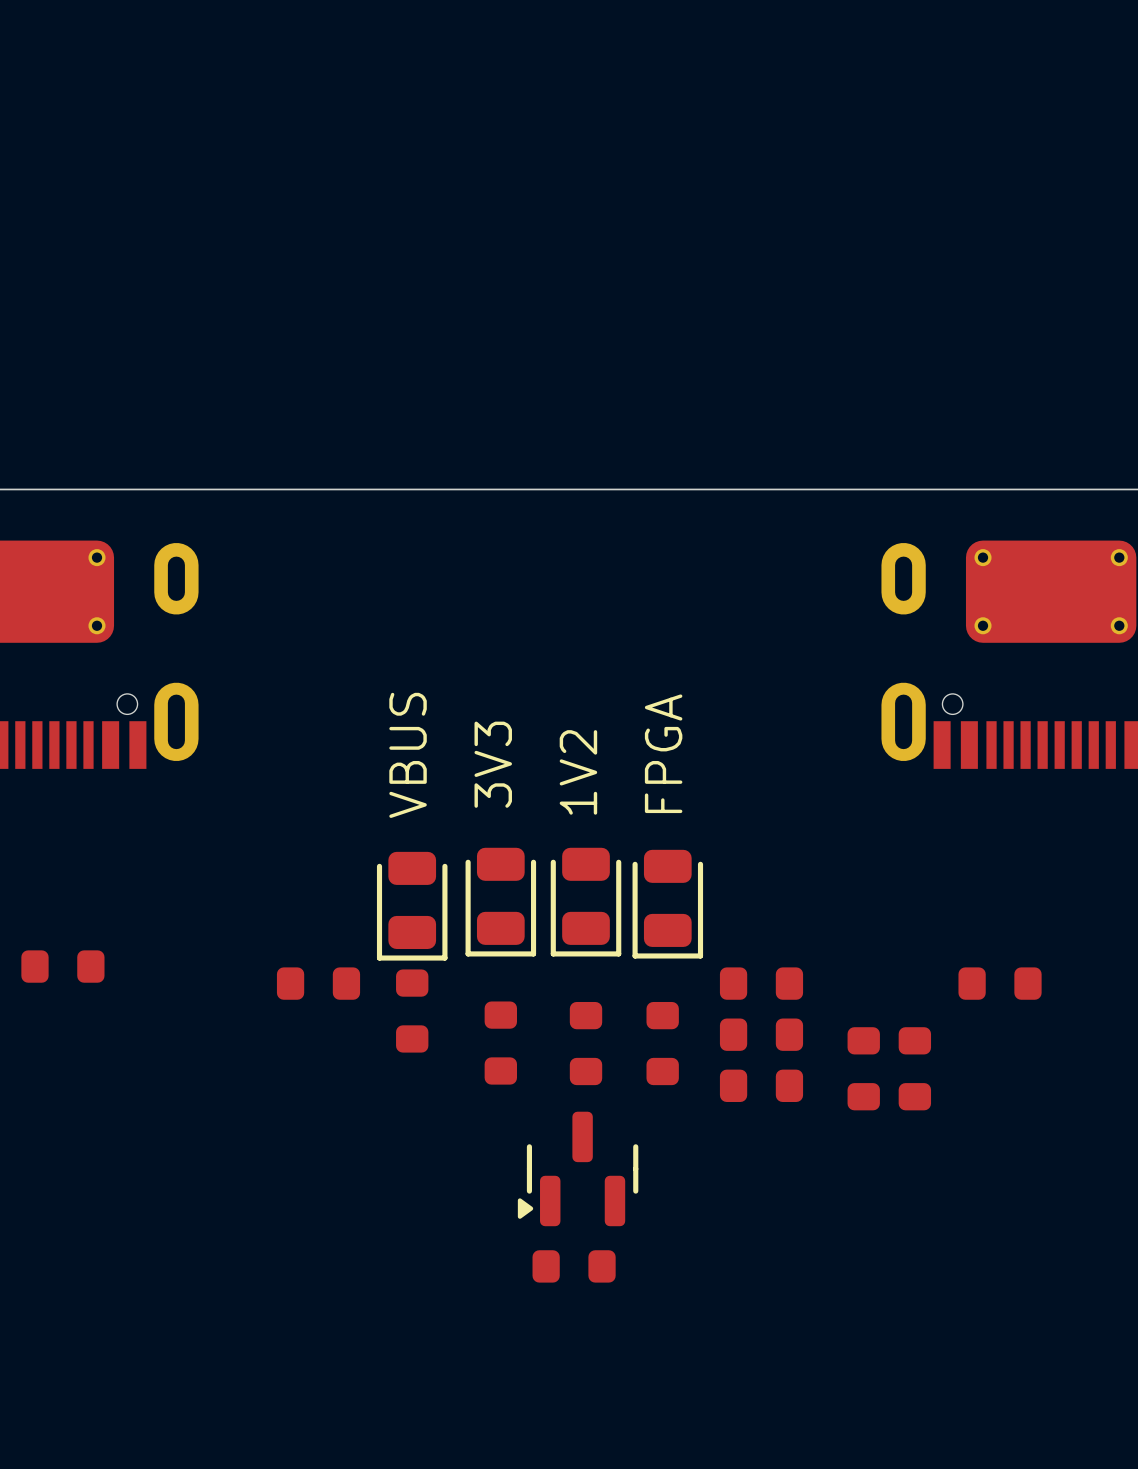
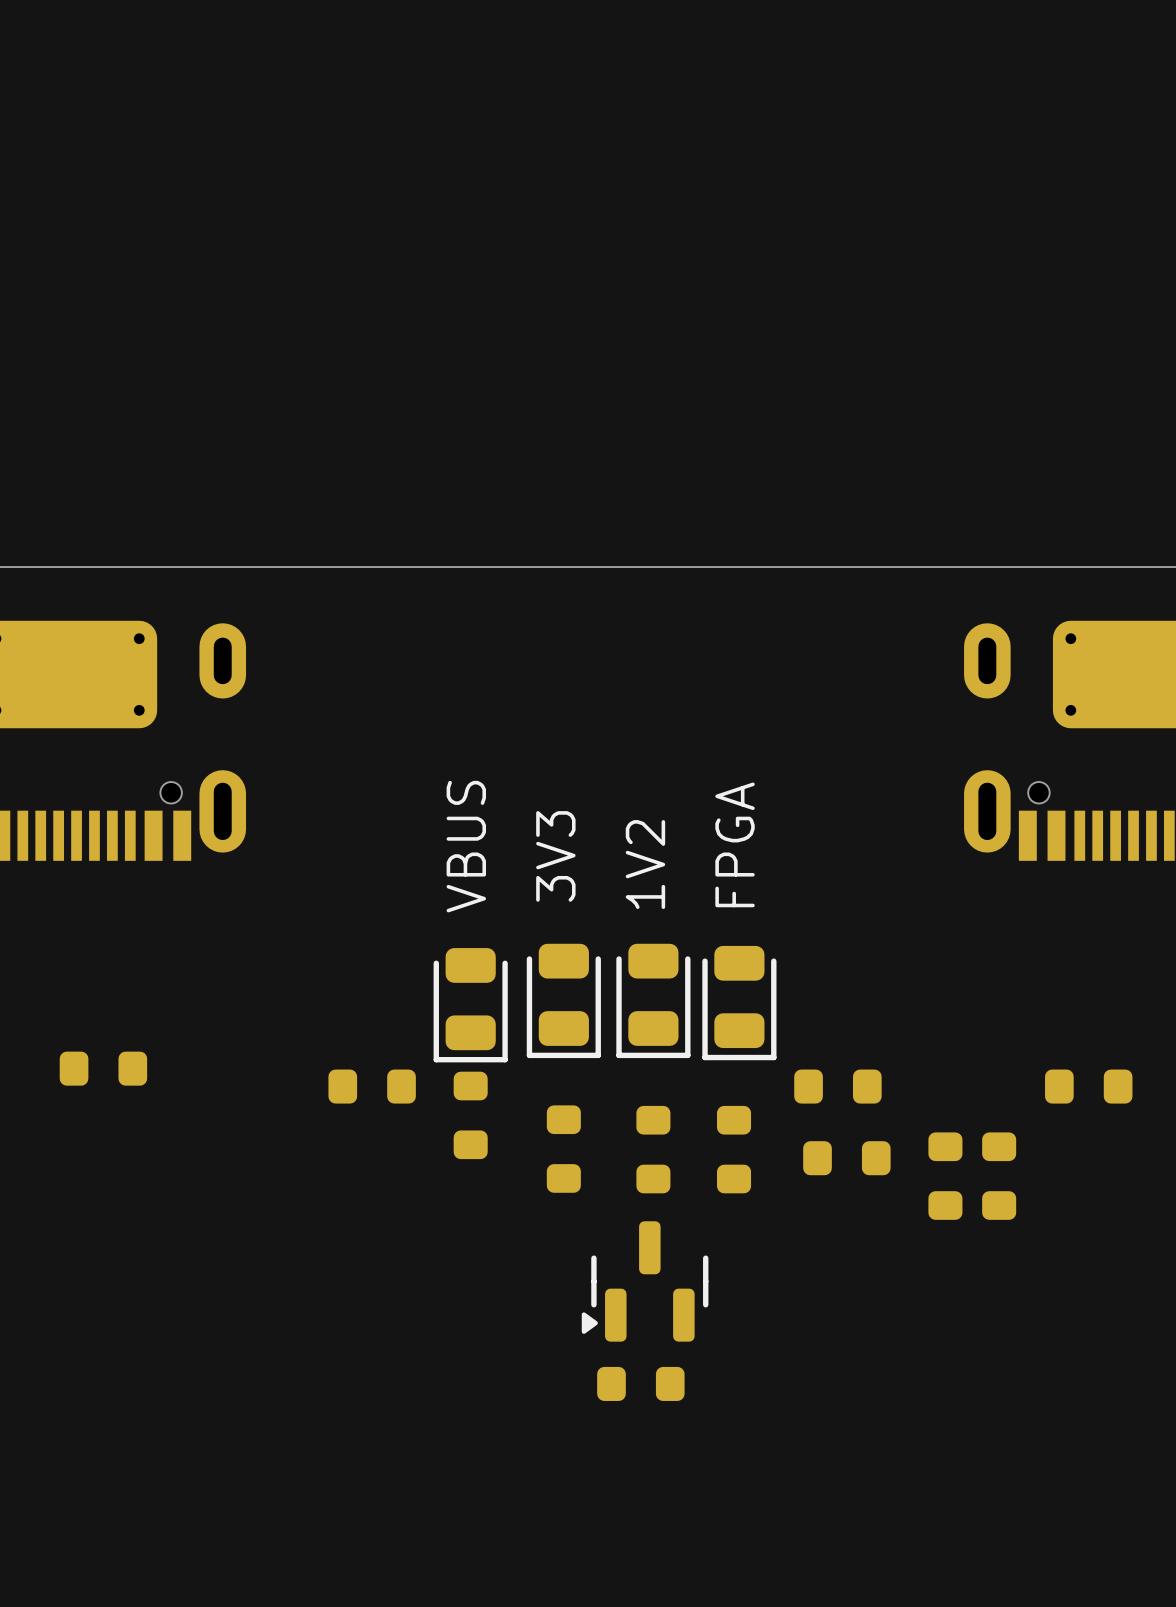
part: (761, 1034) -> none
part: none -> (846, 1158)
part: (761, 1085) -> none

